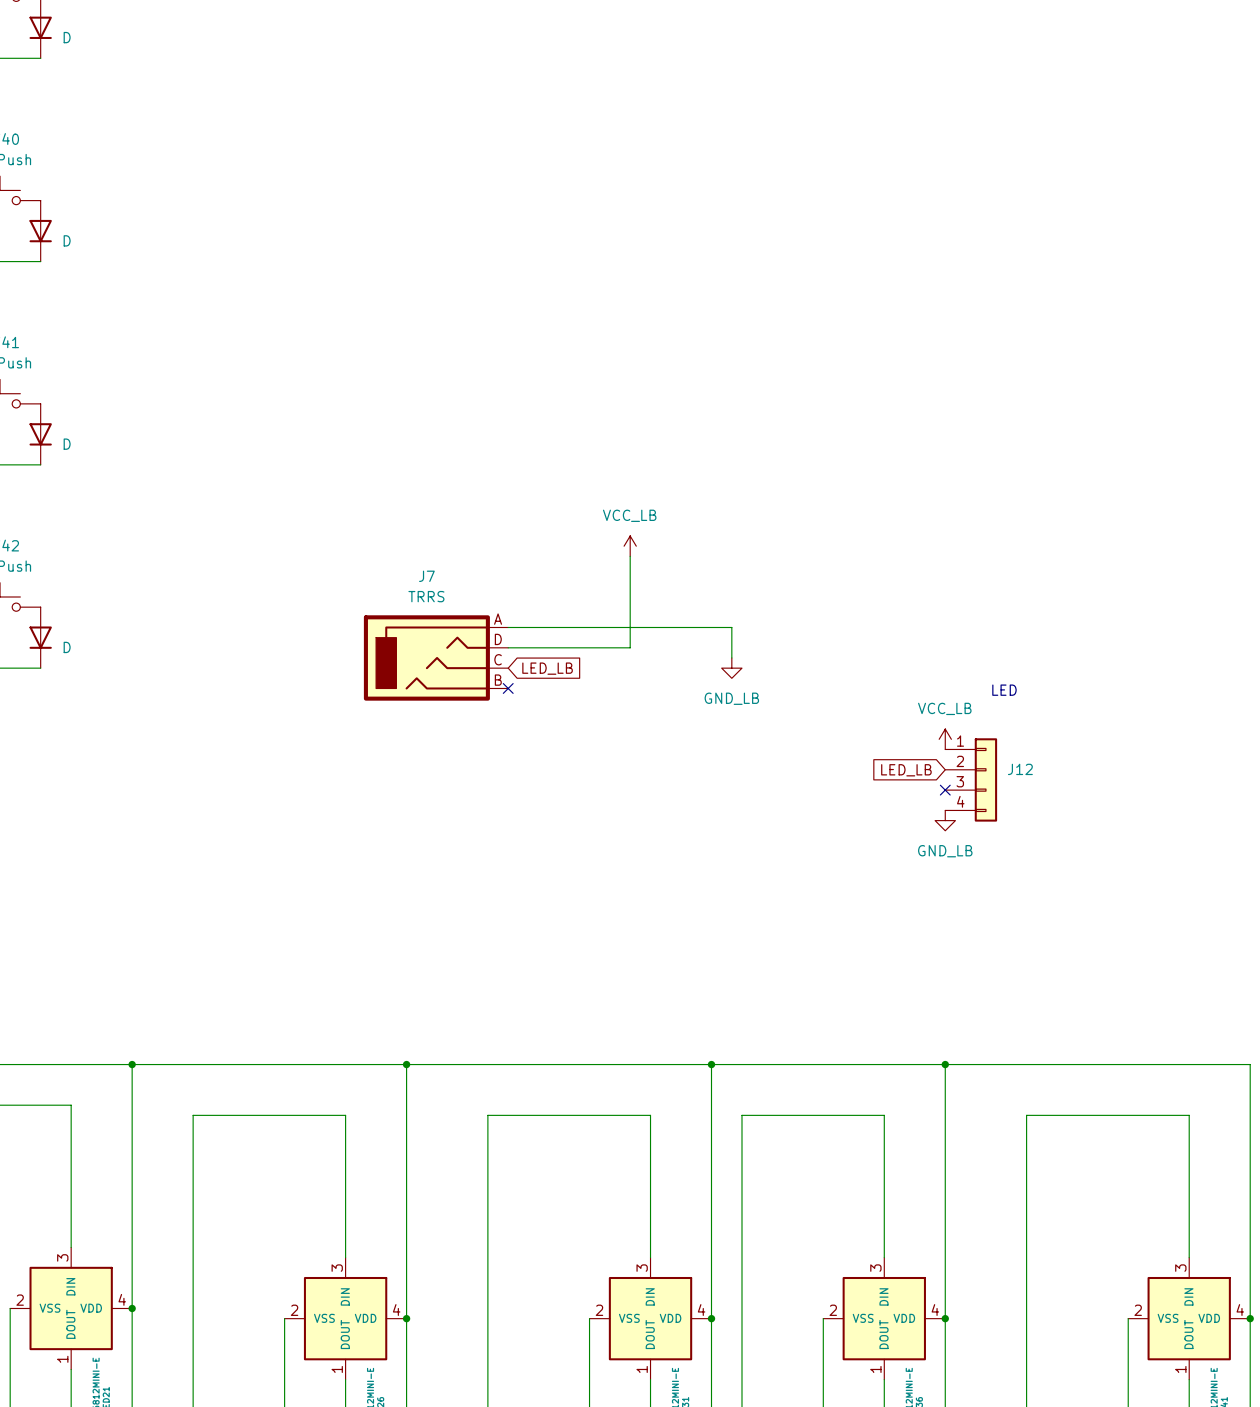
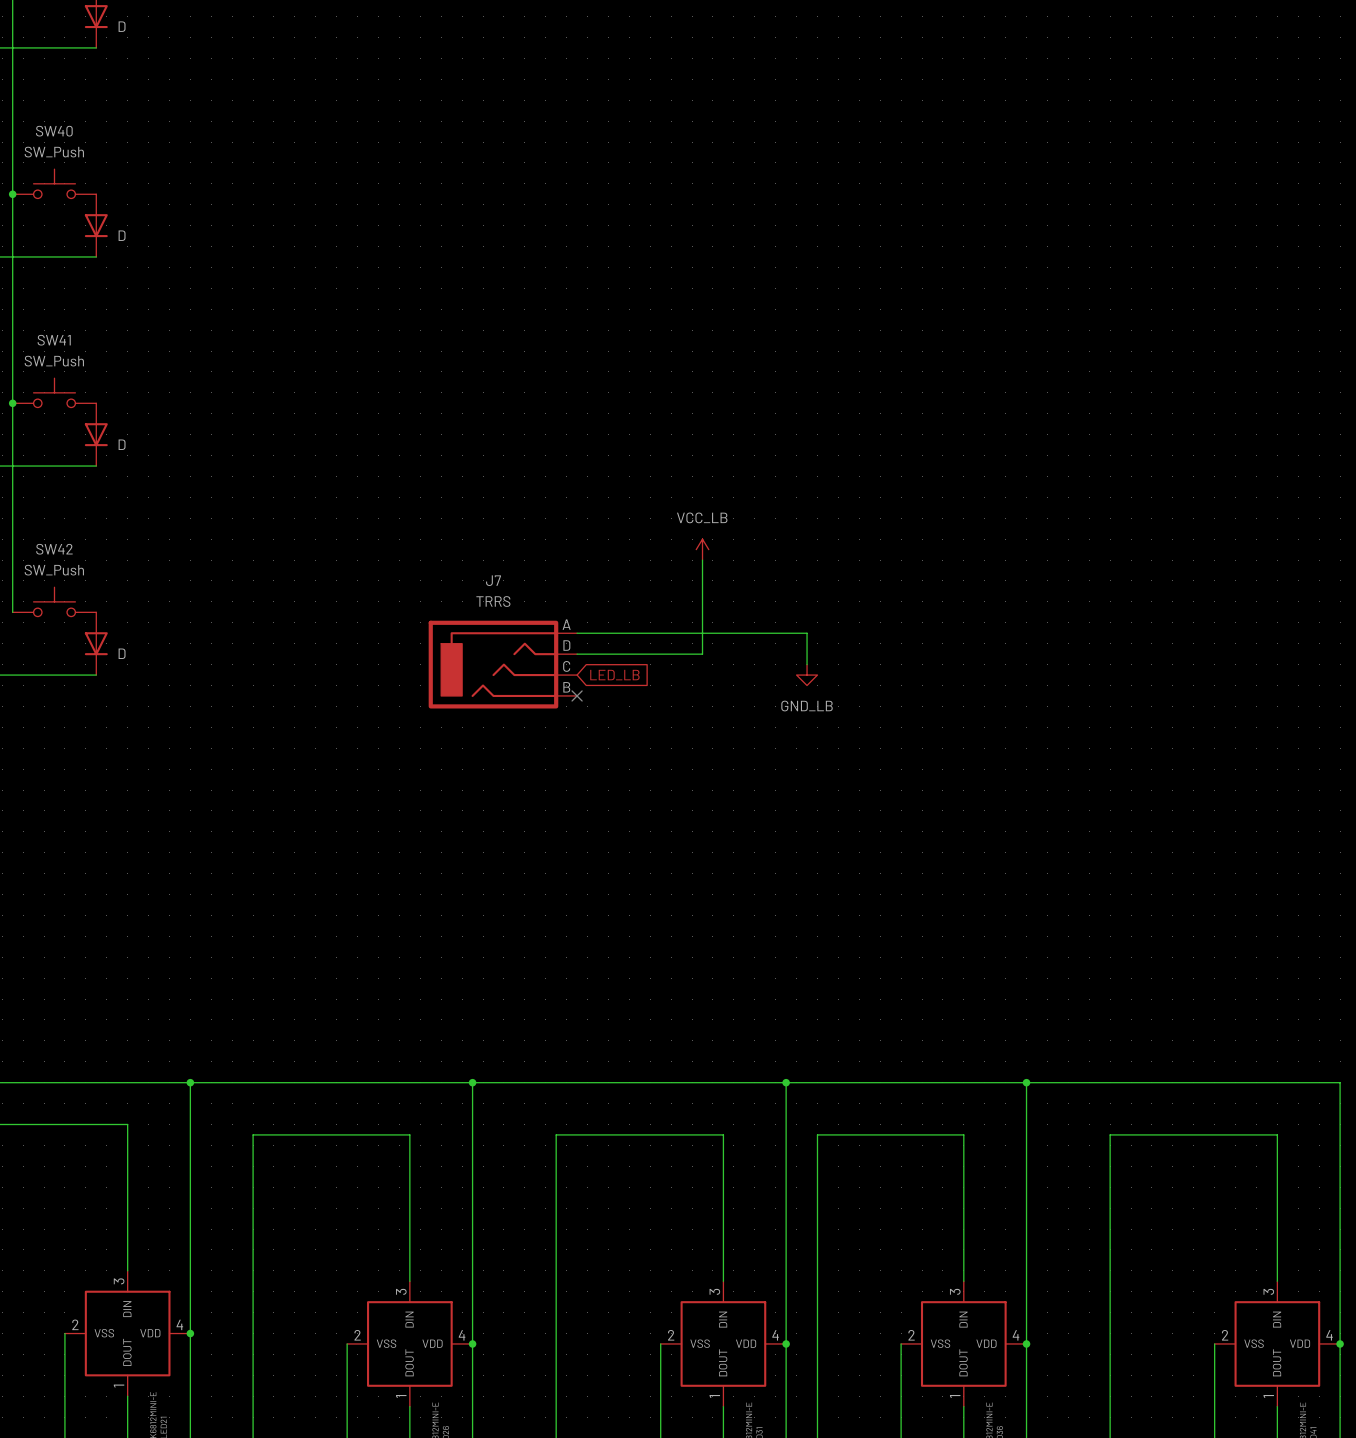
text: LED (1004, 690) -> none
power symbol: VCC_LB (945, 739) -> none
global label: LED_LB (906, 770) -> none
J12: (971, 779) -> none
no-connect mark: (945, 790) -> none
power symbol: GND_LB (945, 820) -> none

